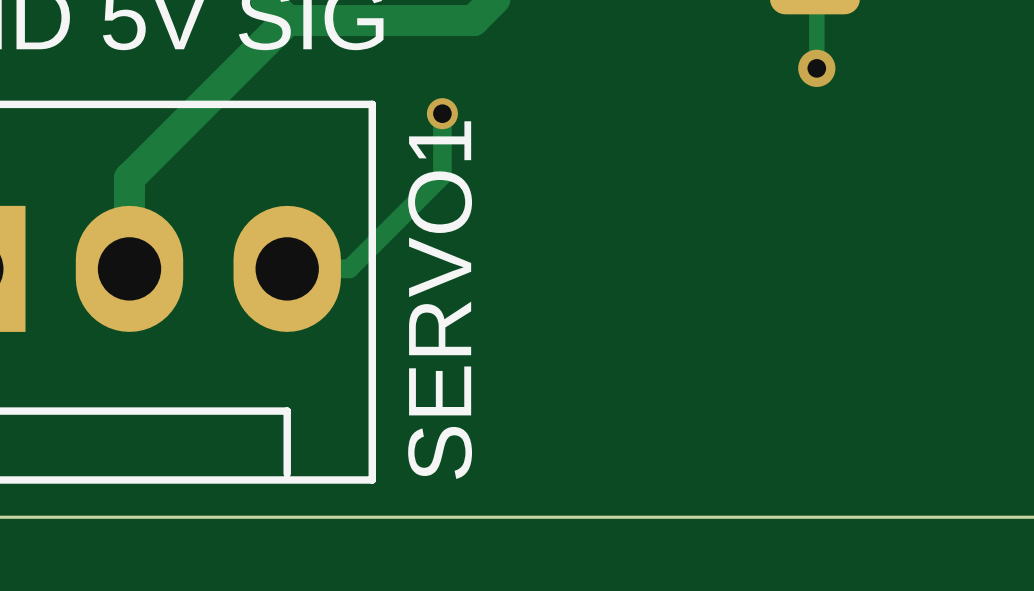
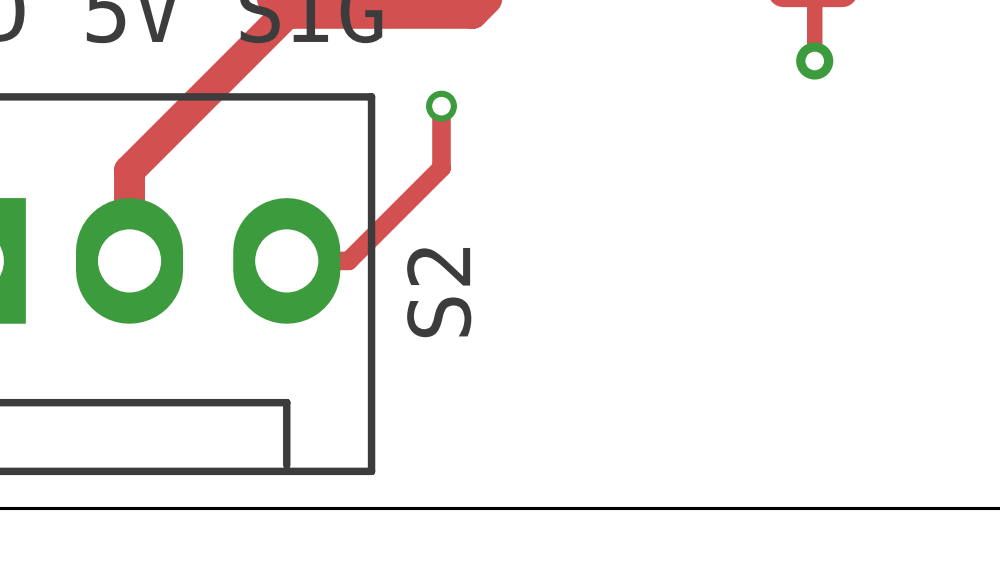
SERVO1 name: SERVO1 (440, 300) -> S2 (439, 292)

